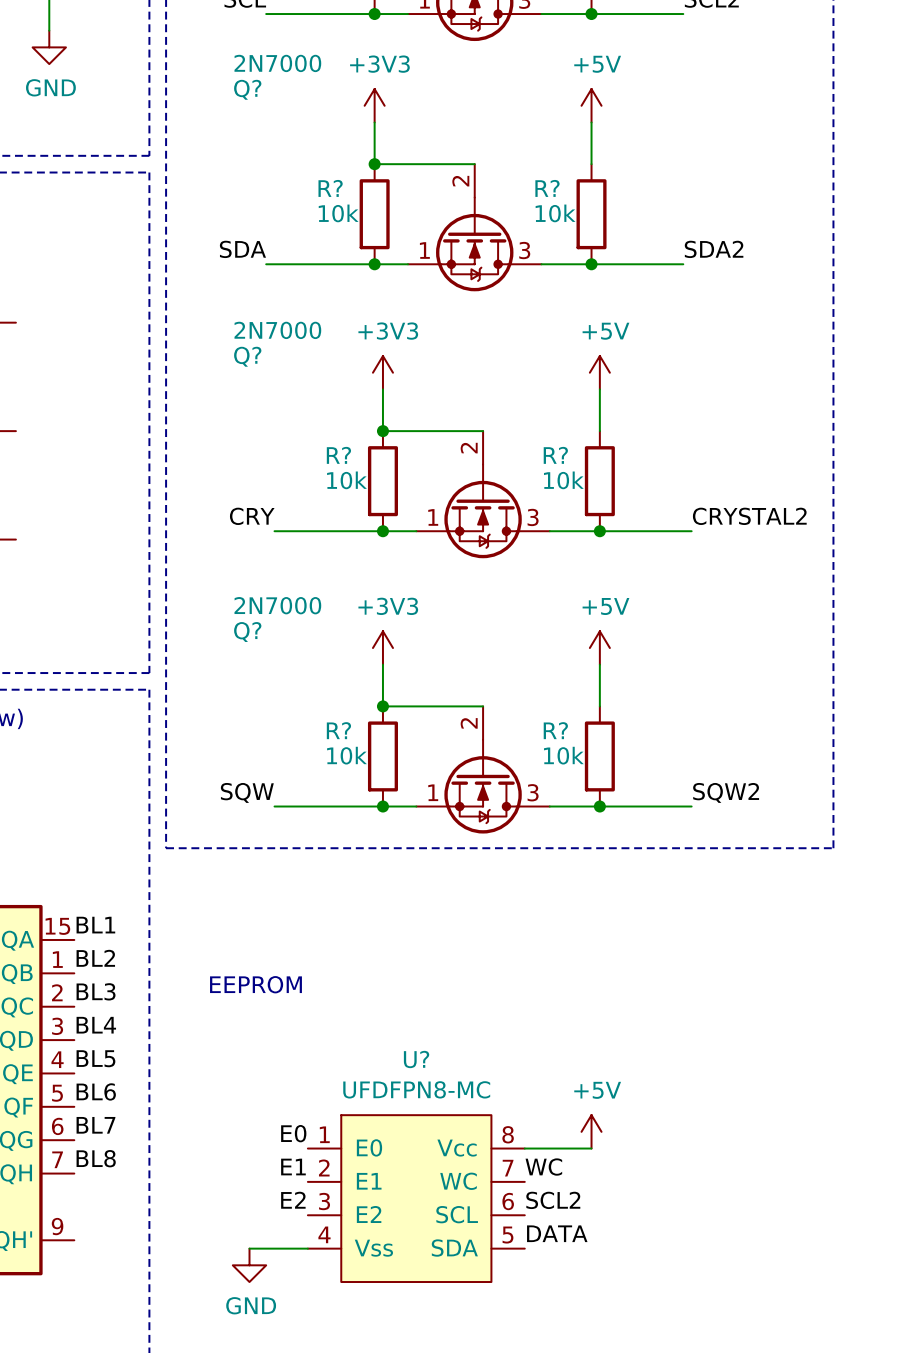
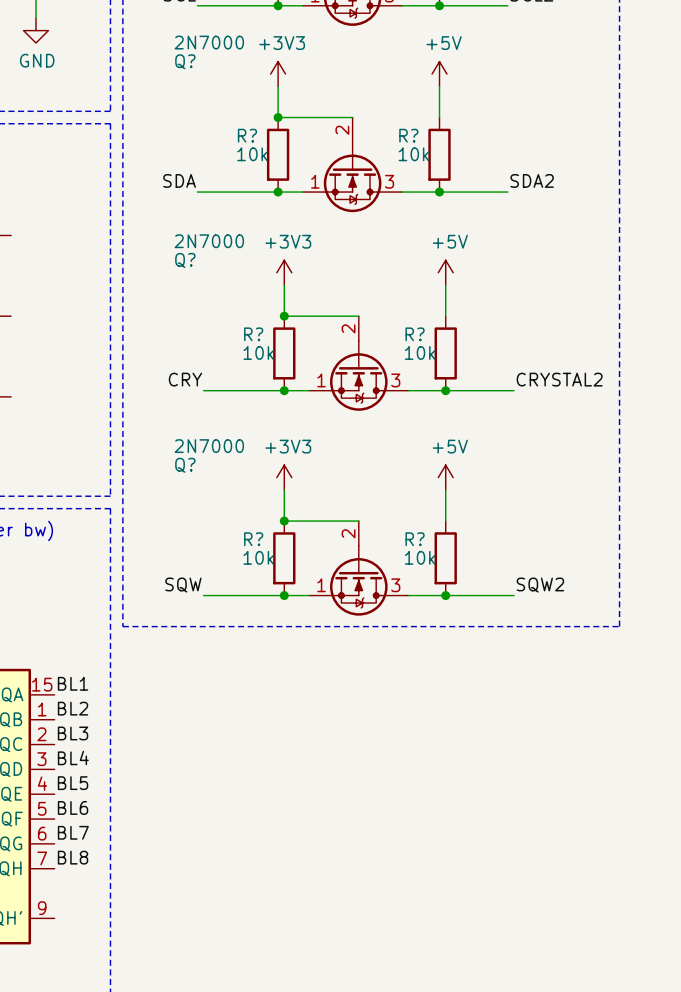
text: EEPROM (255, 984) -> none
power symbol: +5V (591, 1131) -> none
label: E0 (293, 1133) -> none
wire: (524, 1148) (591, 1148) -> none
label: E1 (293, 1167) -> none
label: WC (543, 1167) -> none
U?: UFDFPN8-MC (416, 1198) -> none
label: E2 (293, 1200) -> none
label: SCL2 (553, 1200) -> none
label: DATA (557, 1233) -> none
wire: (249, 1248) (307, 1248) -> none
power symbol: GND (249, 1265) -> none

